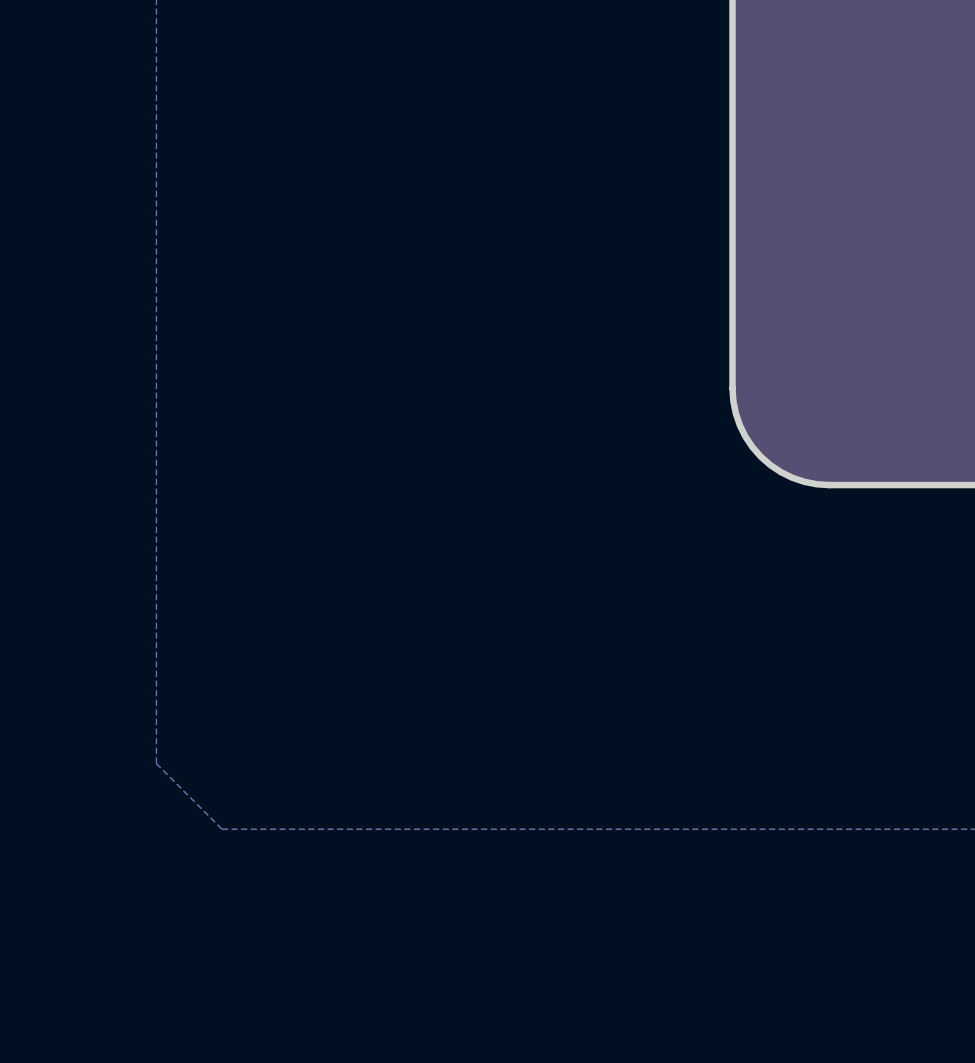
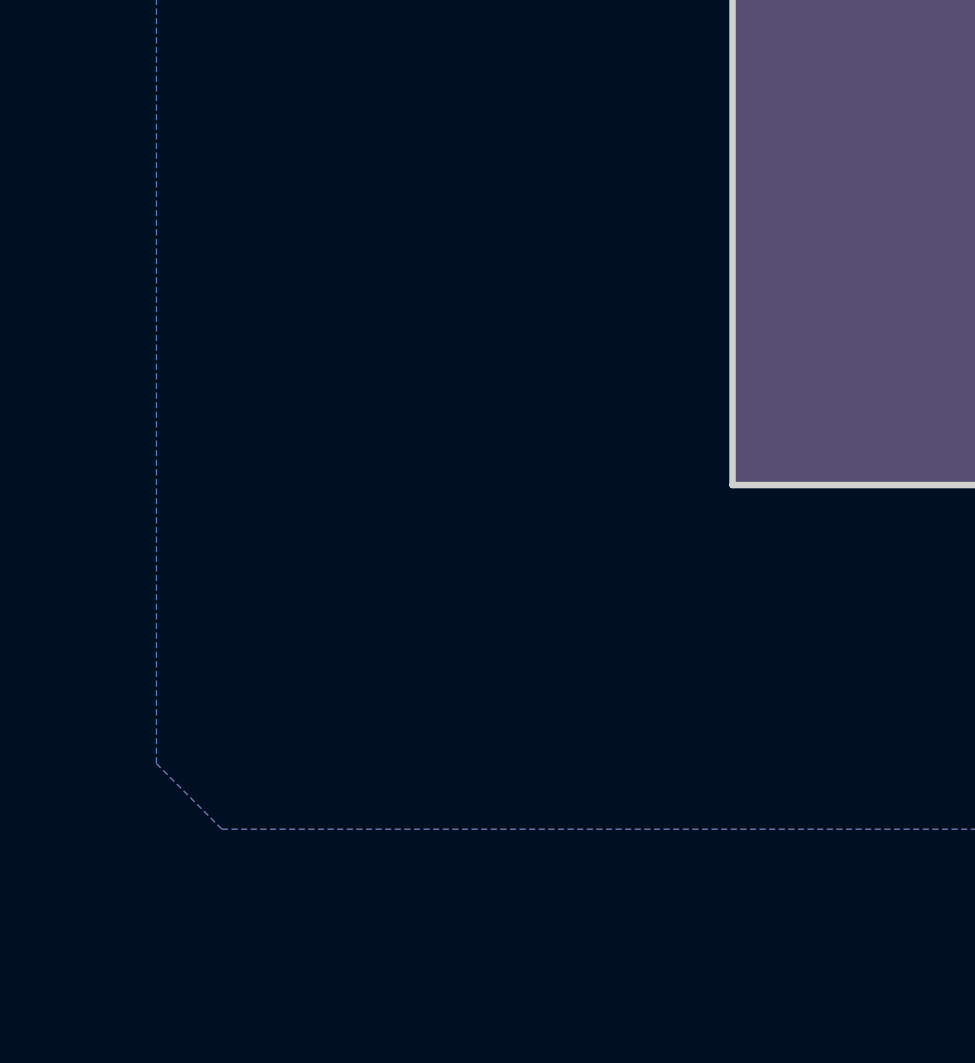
board edge: (732, 388) (735, 413) (739, 425) (745, 436) (760, 456) (780, 472) (792, 477) (816, 484) (829, 485) -> (732, 388) (732, 485) (829, 485)

